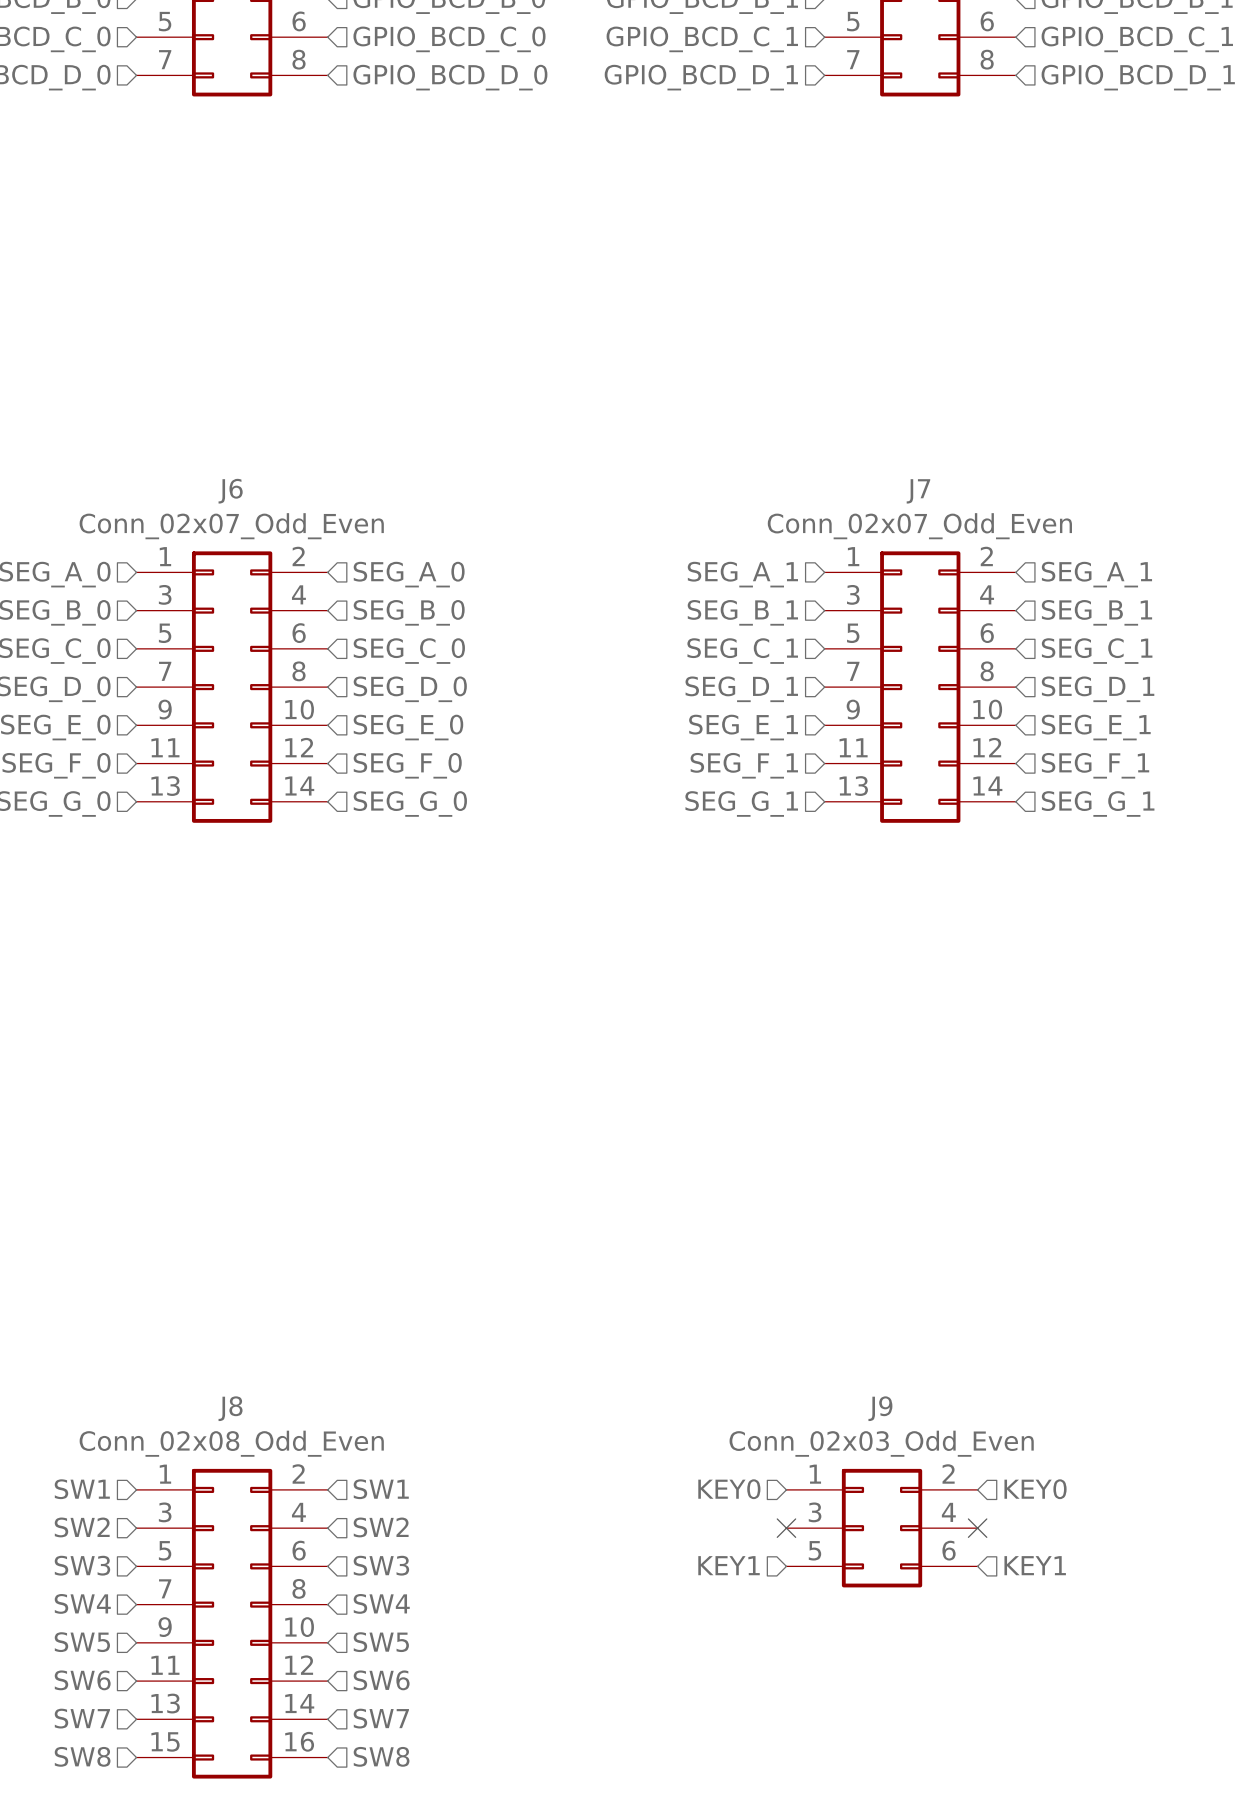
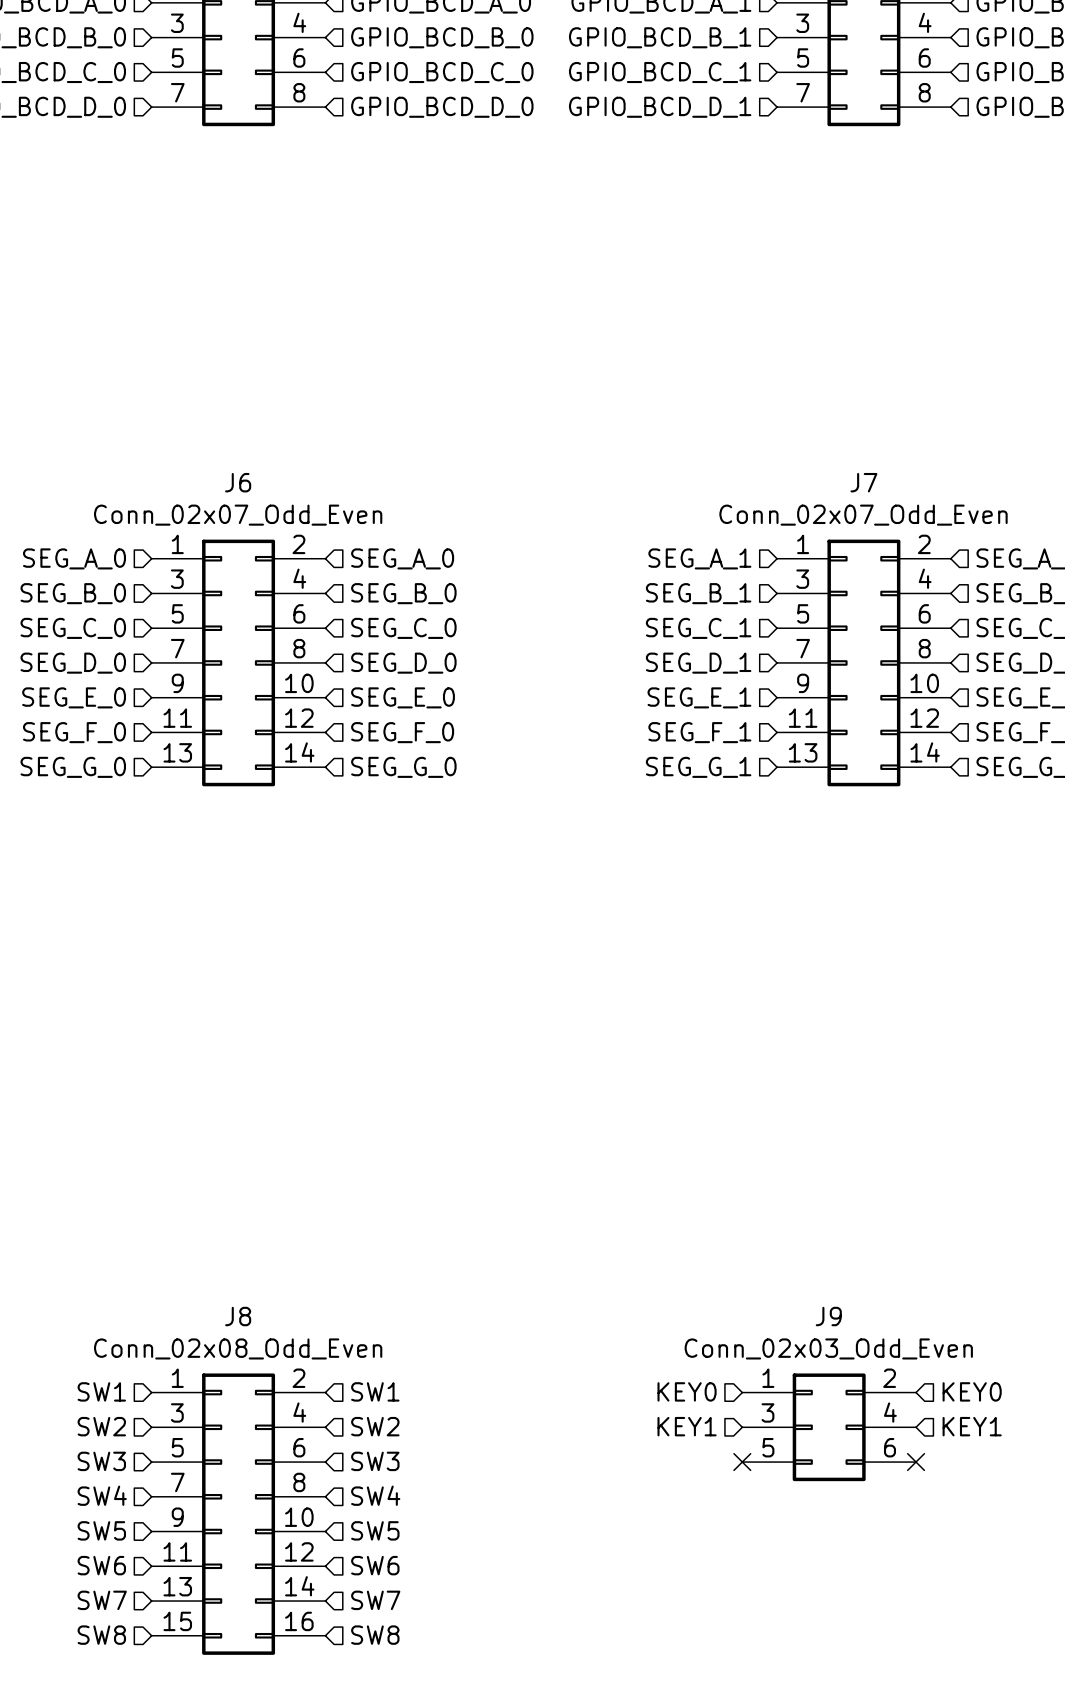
no-connect mark position: (786, 1528) -> (742, 1462)
no-connect mark position: (977, 1528) -> (916, 1462)
hierarchical label position: KEY1 (729, 1565) -> KEY1 (687, 1426)
hierarchical label position: KEY1 (1035, 1565) -> KEY1 (972, 1426)

